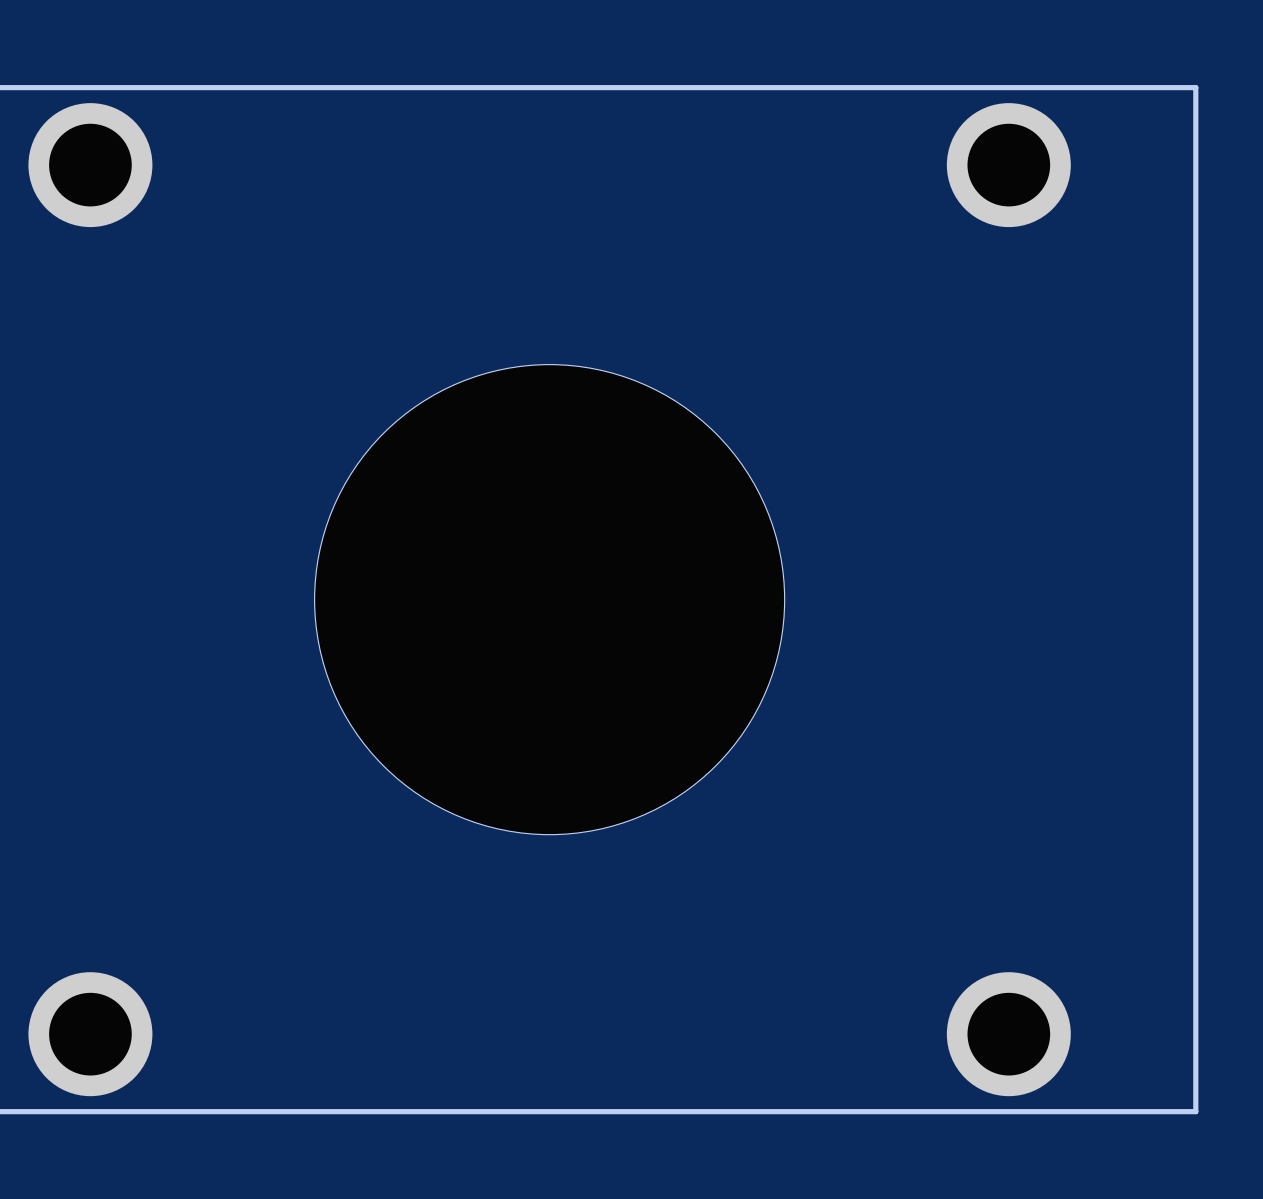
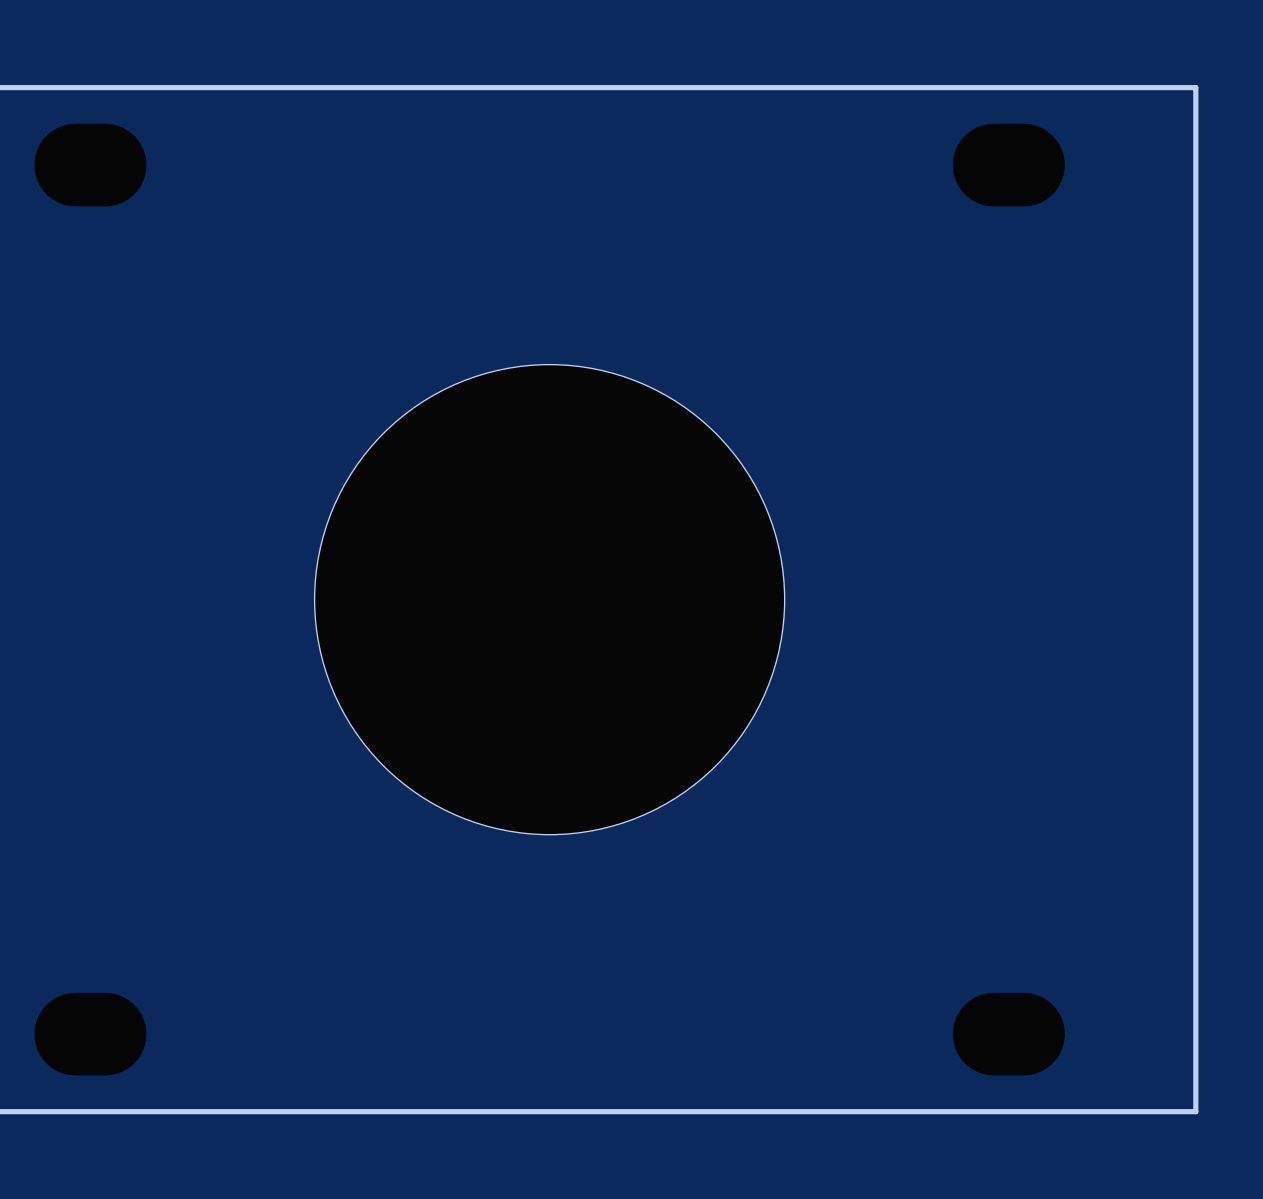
part footprint: [28, 103, 153, 228] -> [34, 123, 147, 207]
part footprint: [946, 103, 1071, 228] -> [952, 123, 1065, 207]
part footprint: [28, 972, 153, 1097] -> [34, 992, 147, 1076]
part footprint: [946, 972, 1071, 1097] -> [952, 992, 1065, 1076]

